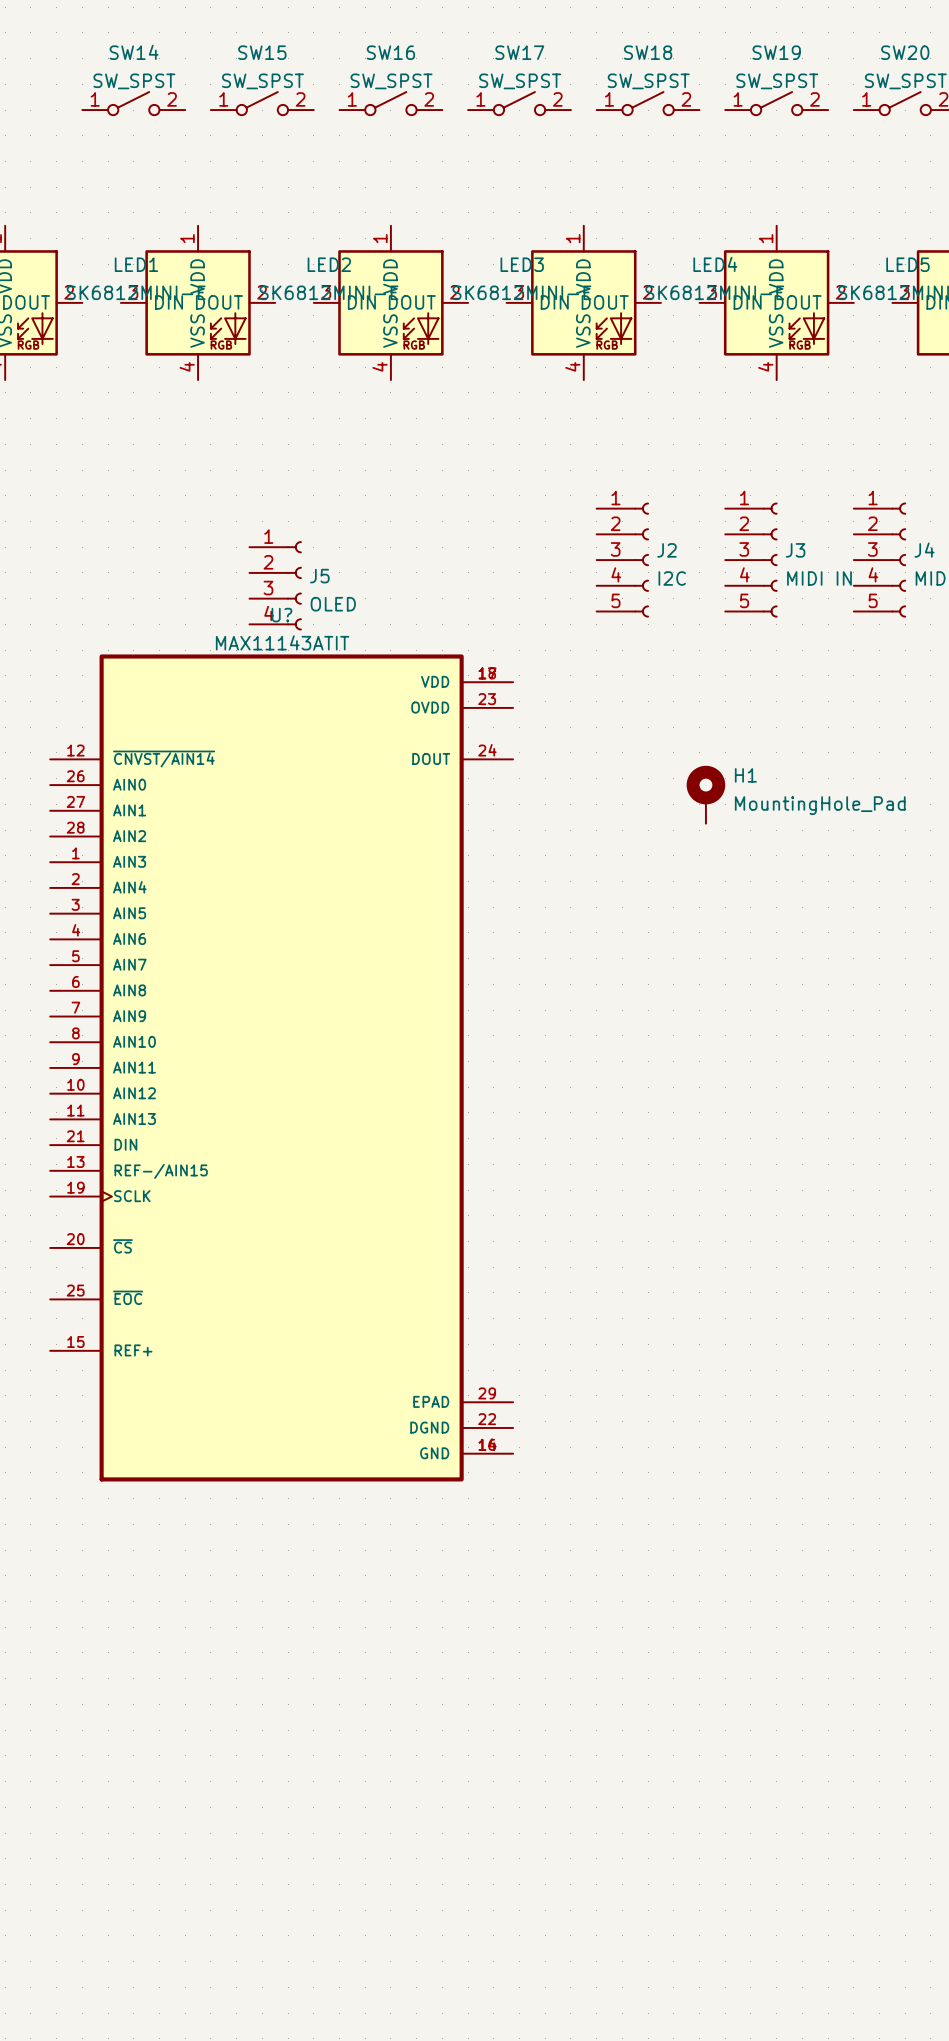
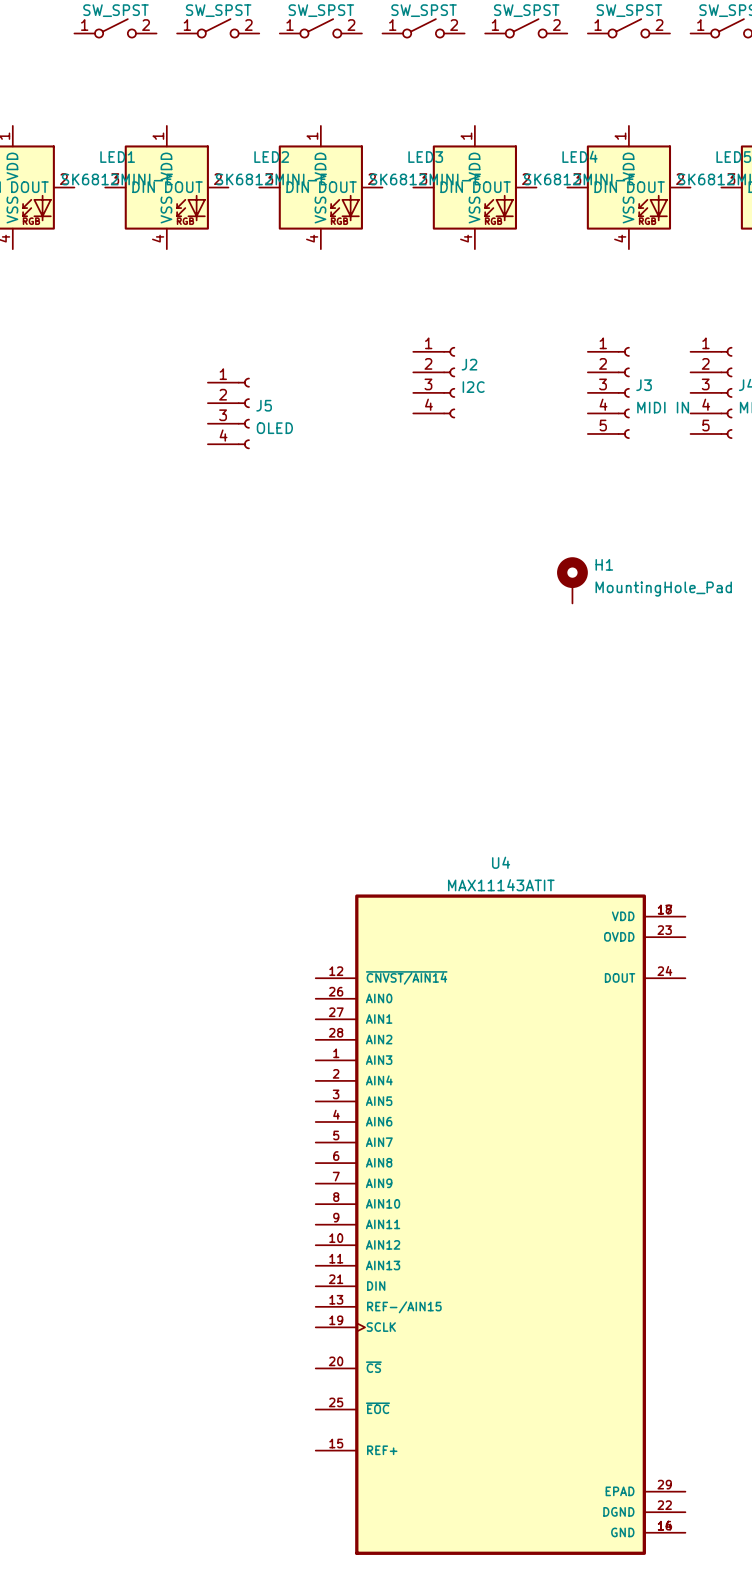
J2 symbol: [596, 502, 649, 618] -> [413, 347, 455, 419]
U?: MAX11143ATIT (281, 1067) -> none
U4: none -> MAX11143ATIT (500, 1224)

